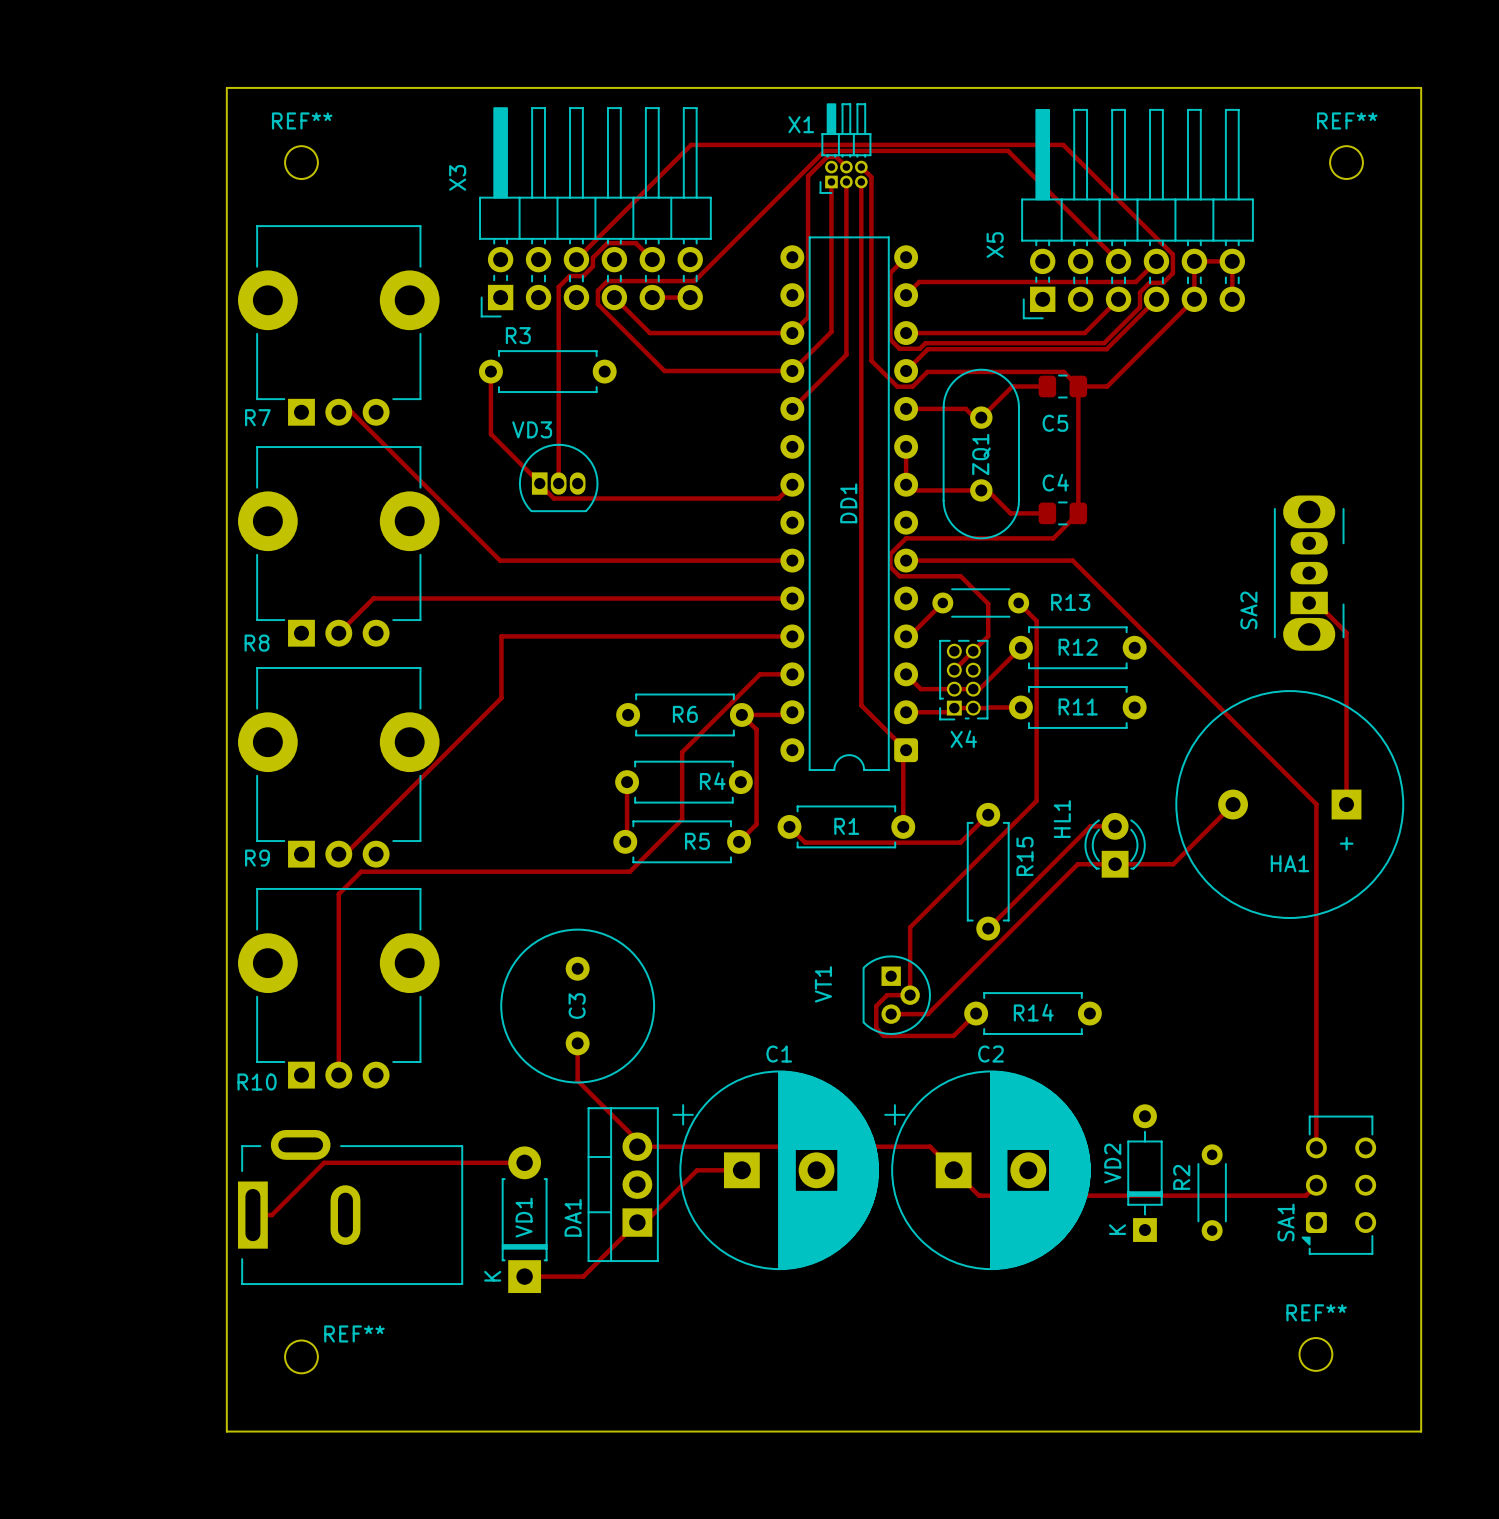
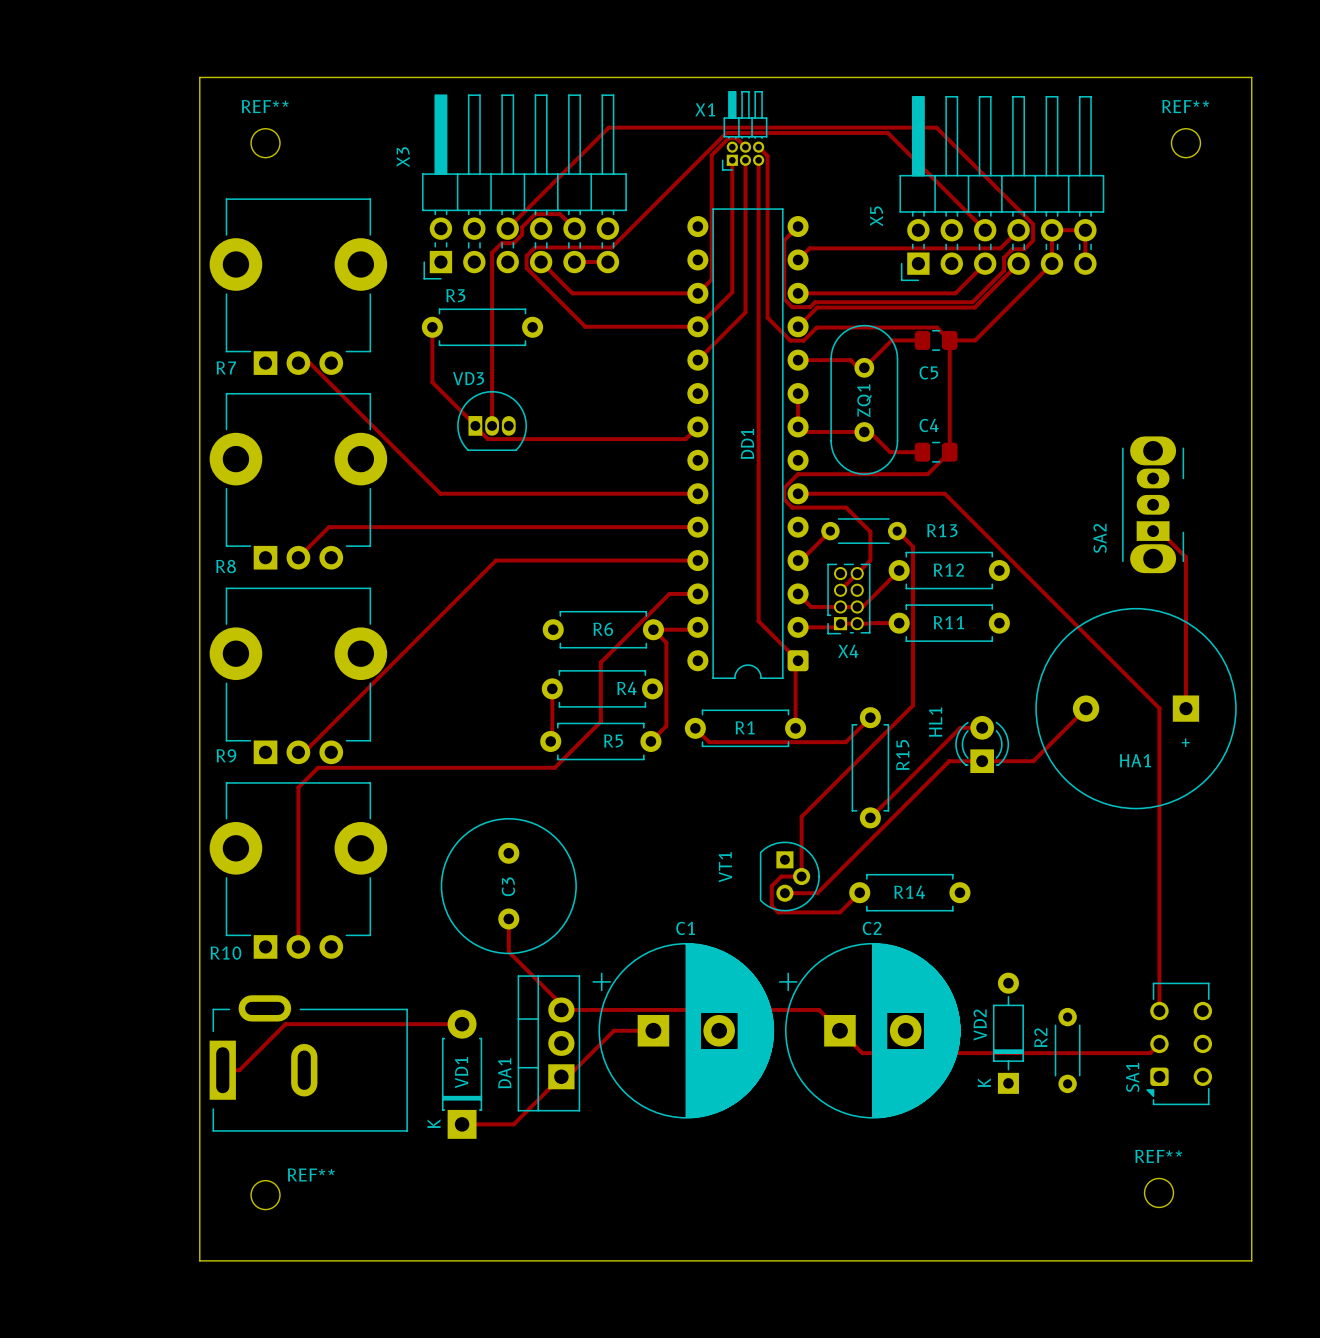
track: (563, 636) (501, 636) (501, 698) -> (495, 560) (441, 614)

